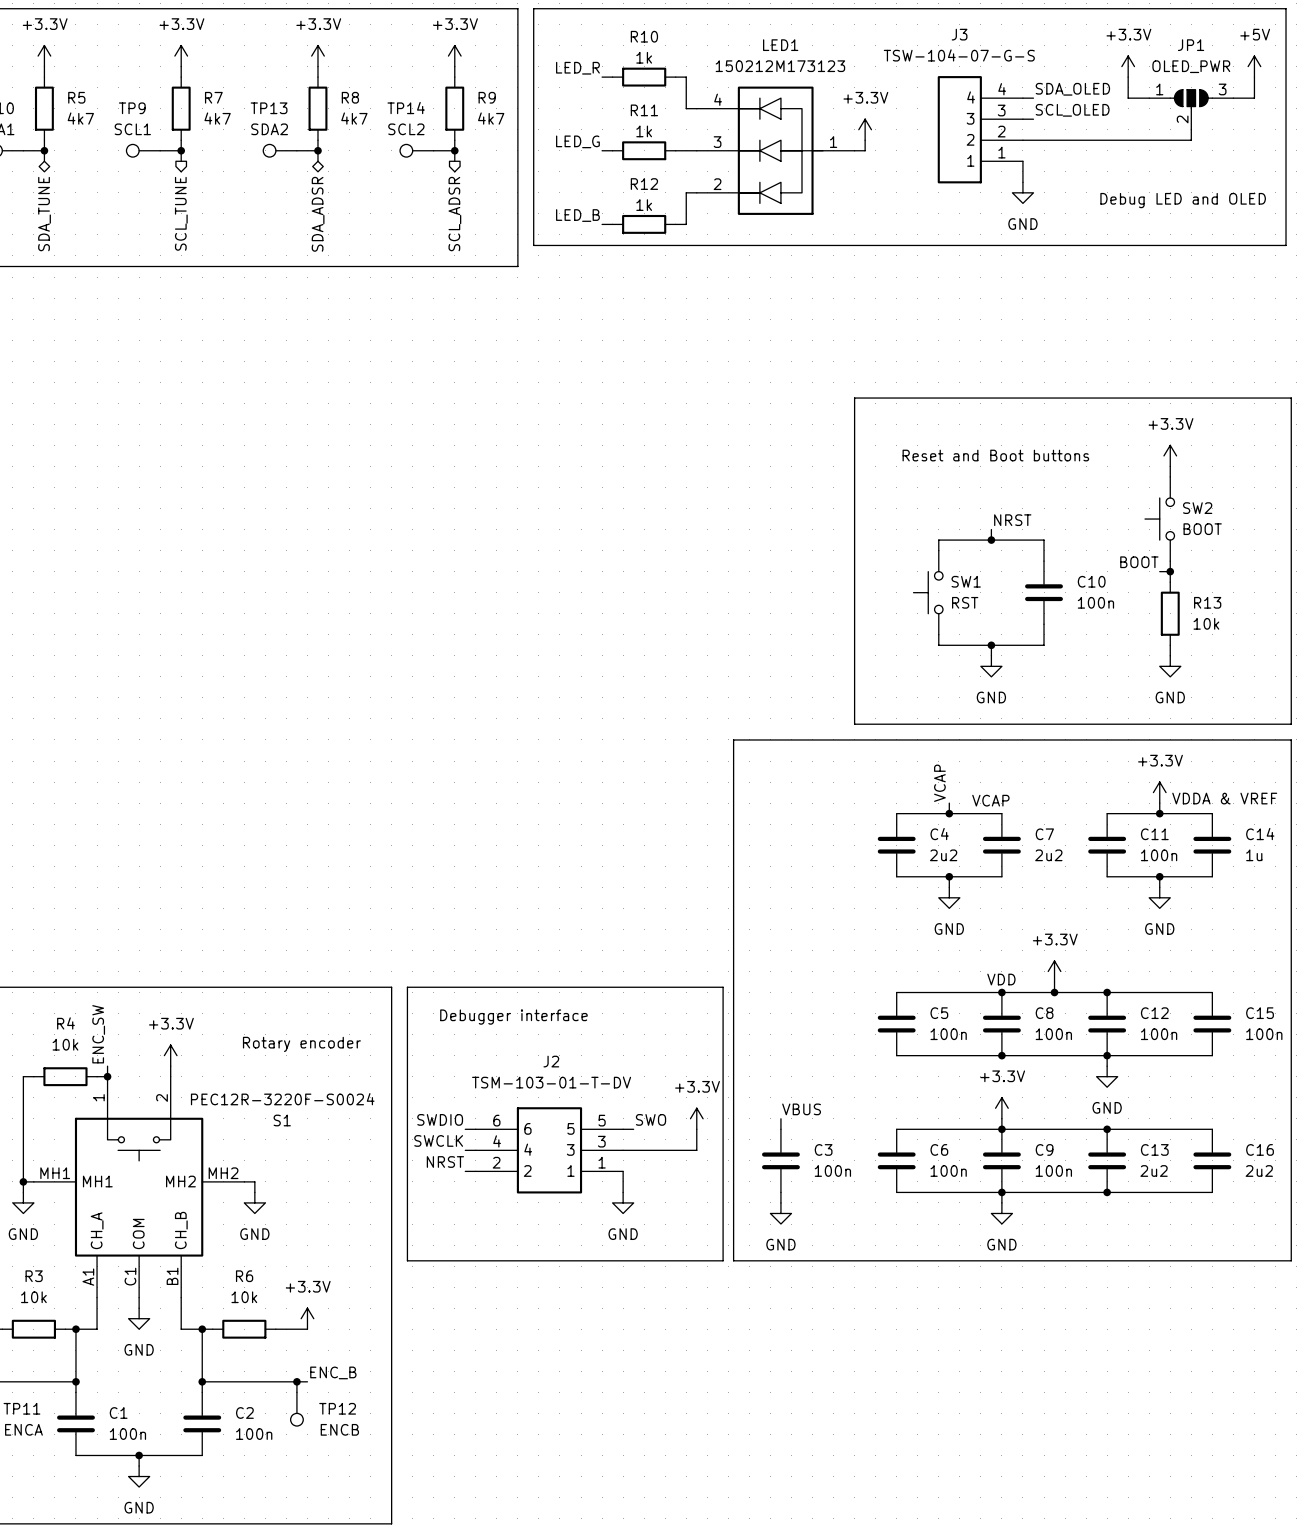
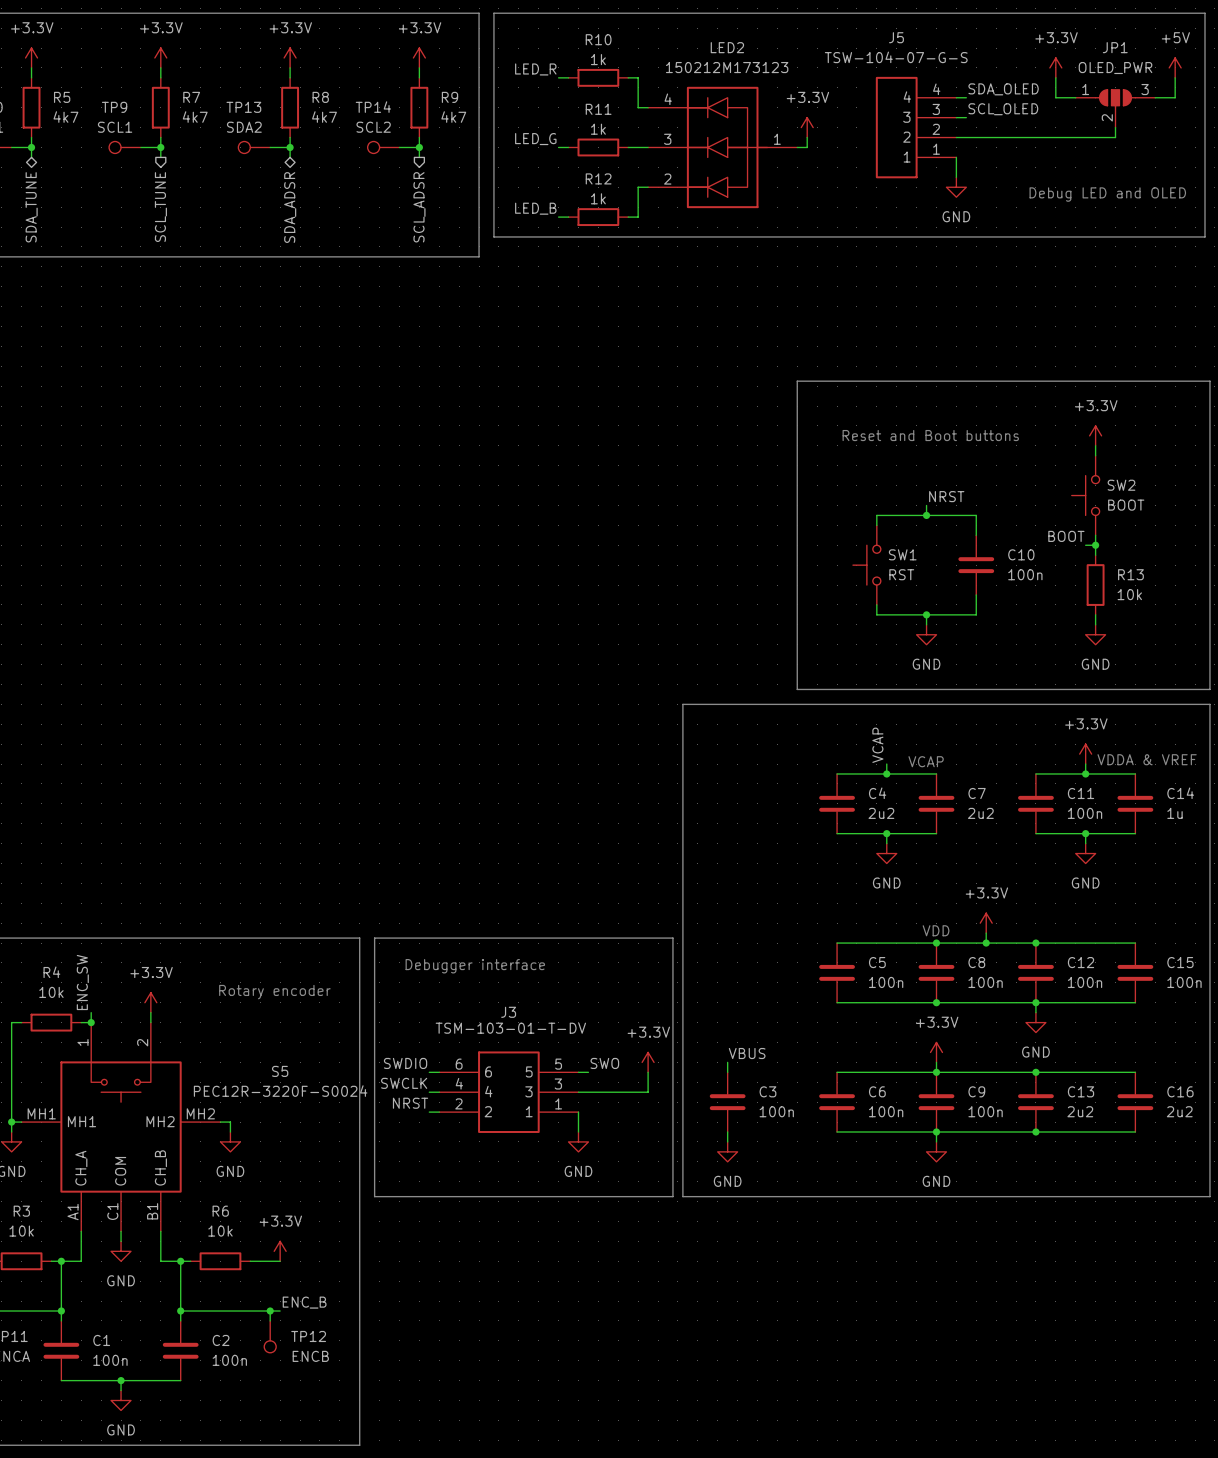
J3 name: J3 (959, 34) -> J5 (896, 37)
LED1 name: LED1 (780, 45) -> LED2 (727, 47)
J2 name: J2 (551, 1061) -> J3 (508, 1012)
S1 value position: PEC12R-3220F-S0024 (282, 1099) -> PEC12R-3220F-S0024 (280, 1091)
S1 name: S1 (282, 1120) -> S5 (280, 1071)

